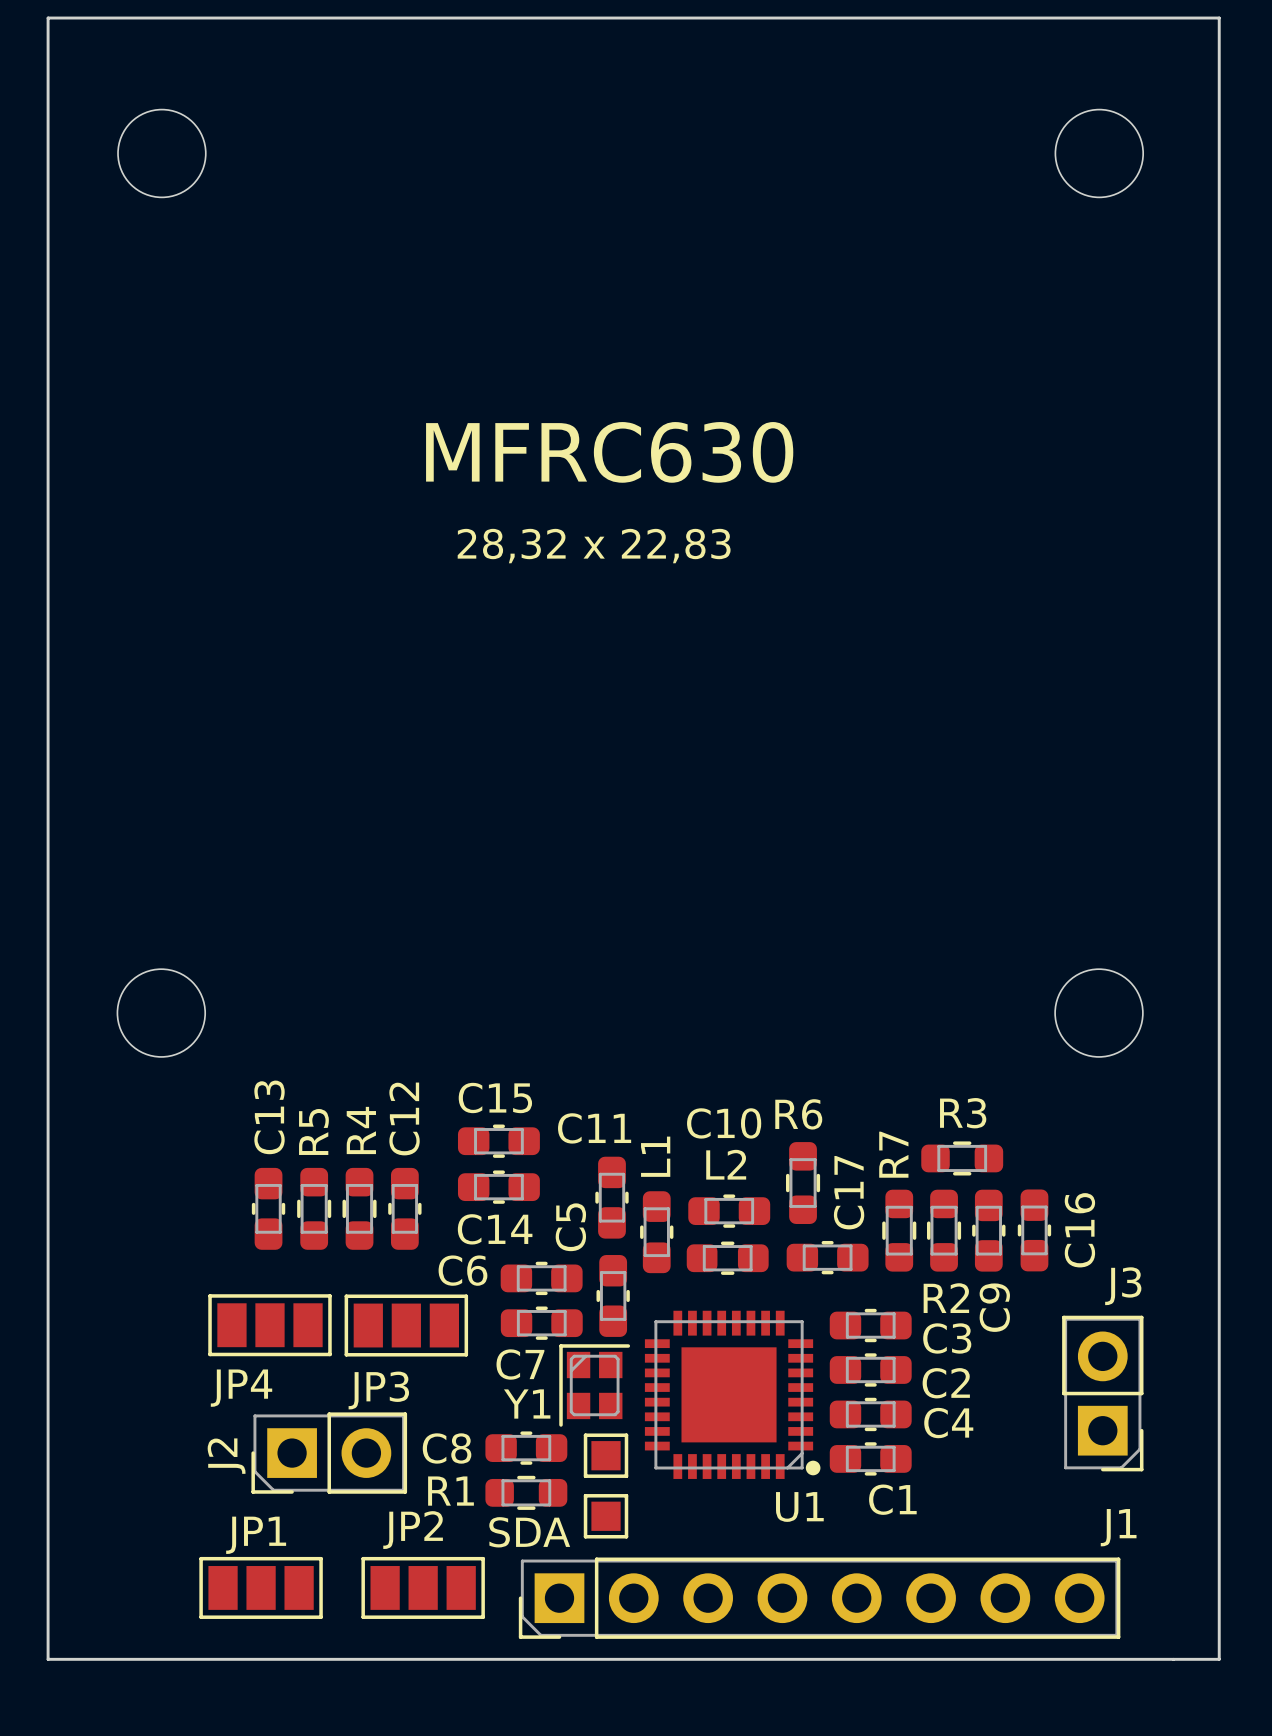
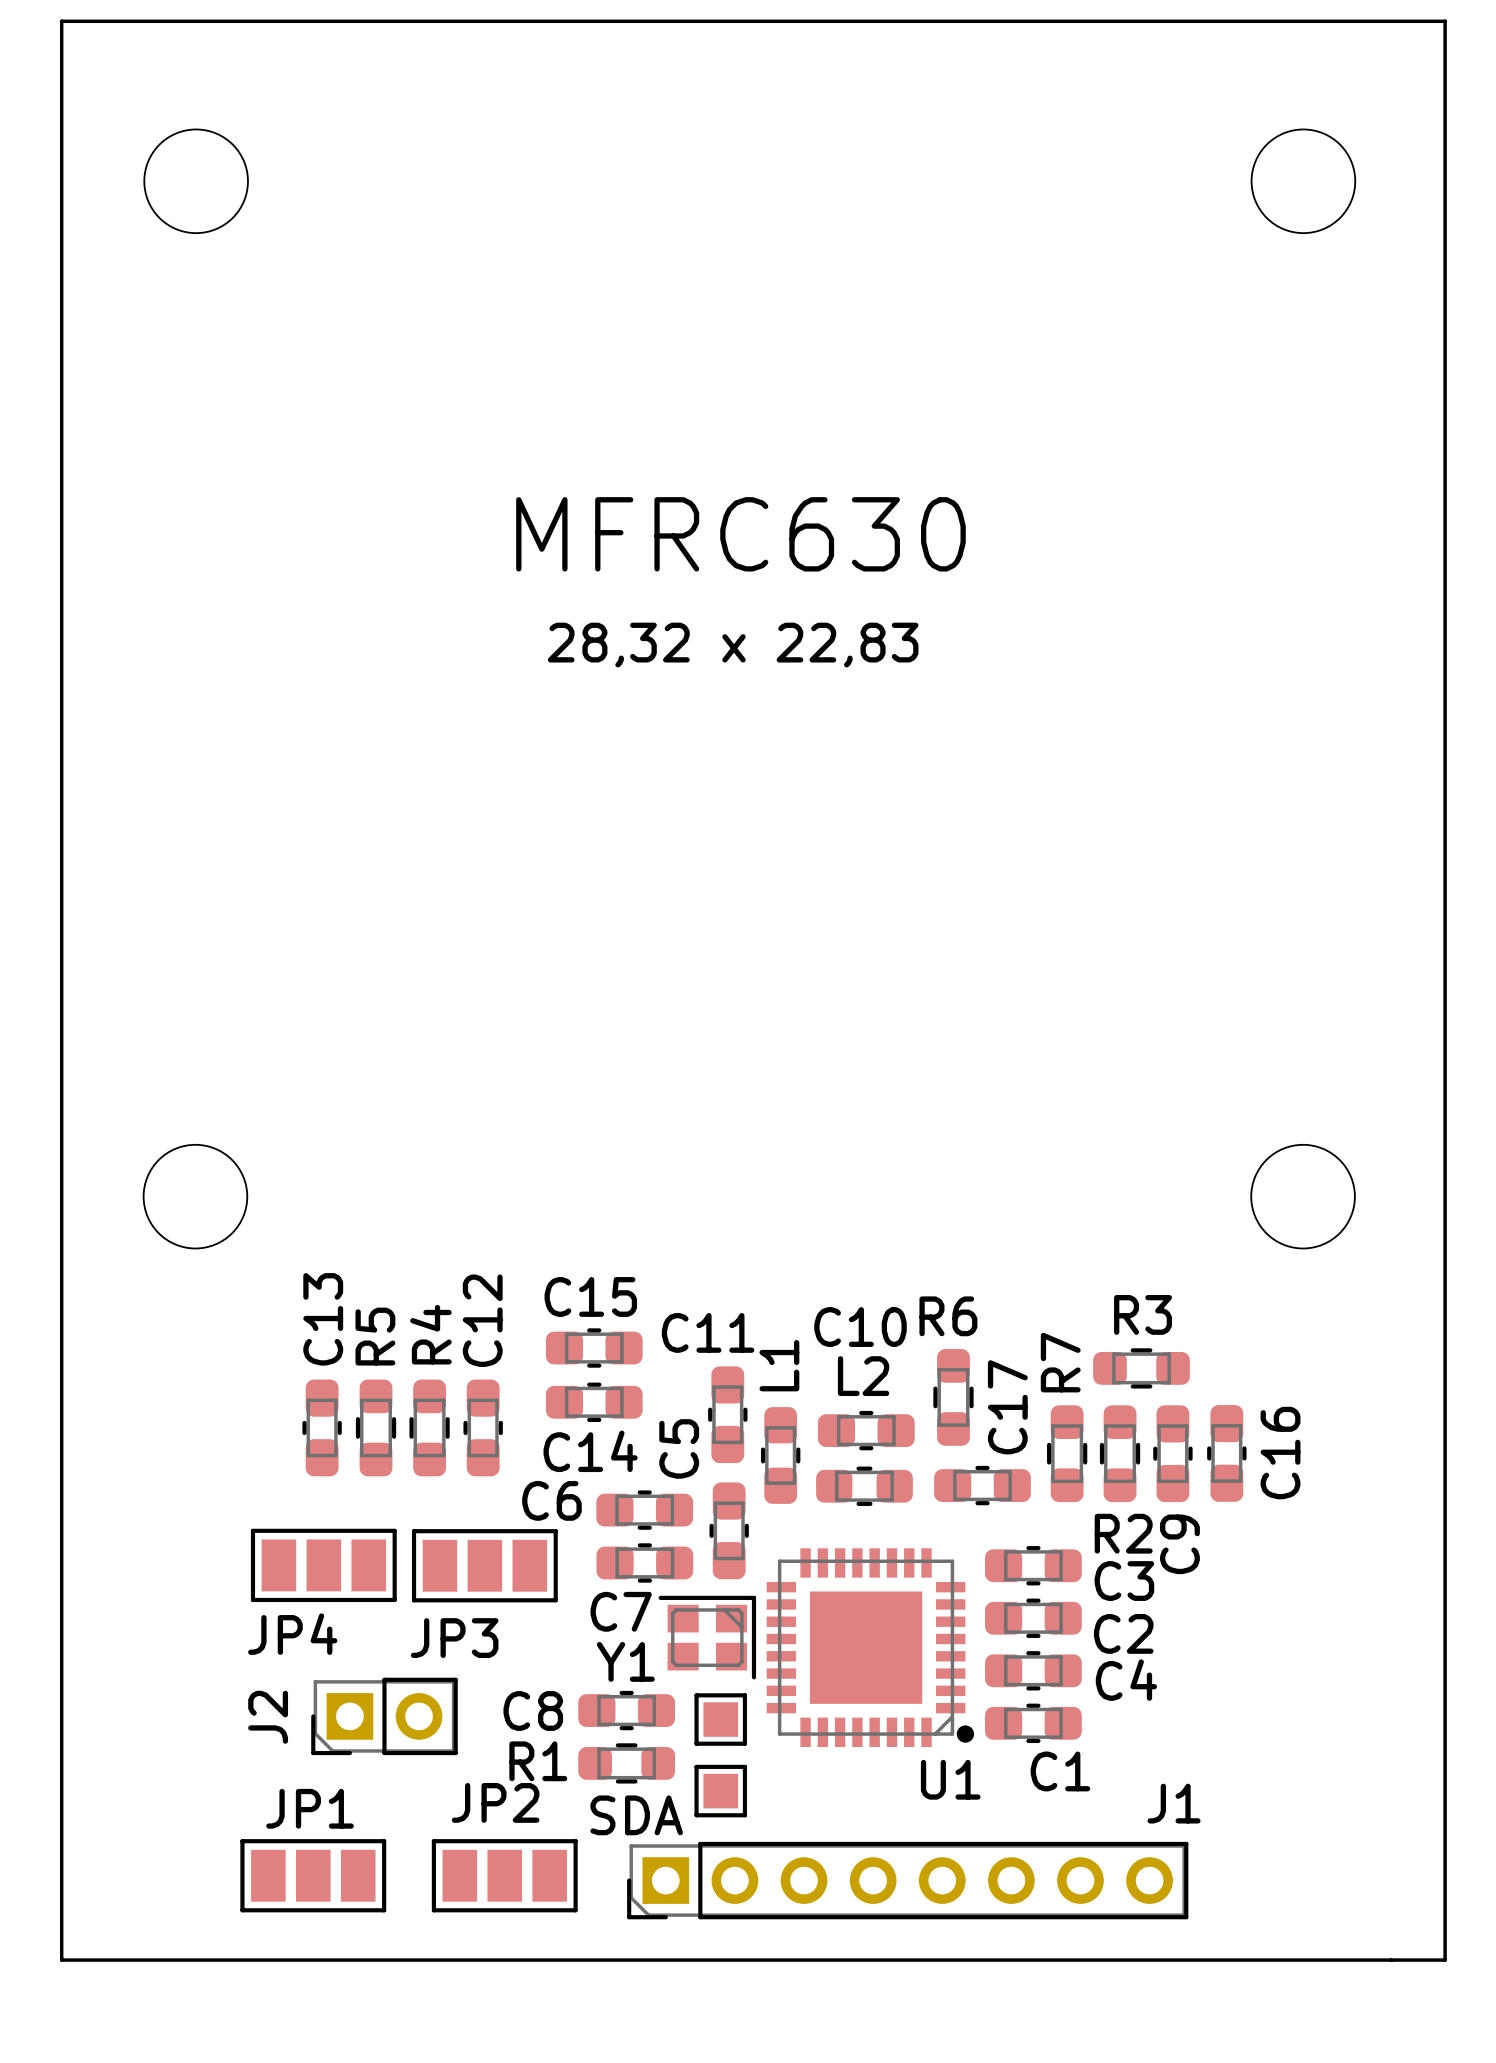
Y1 rotation: 0° (594, 1385) -> 90° clockwise (707, 1637)
J3: (1102, 1393) -> none
J2 footprint: [251, 1412, 408, 1494] -> [311, 1677, 458, 1756]
J1 name position: J1 (1118, 1527) -> J1 (1174, 1803)
text: SDA (529, 1532) -> none
SDA name: none -> SDA (636, 1815)
J1 footprint: [518, 1557, 1121, 1639] -> [627, 1841, 1189, 1920]

